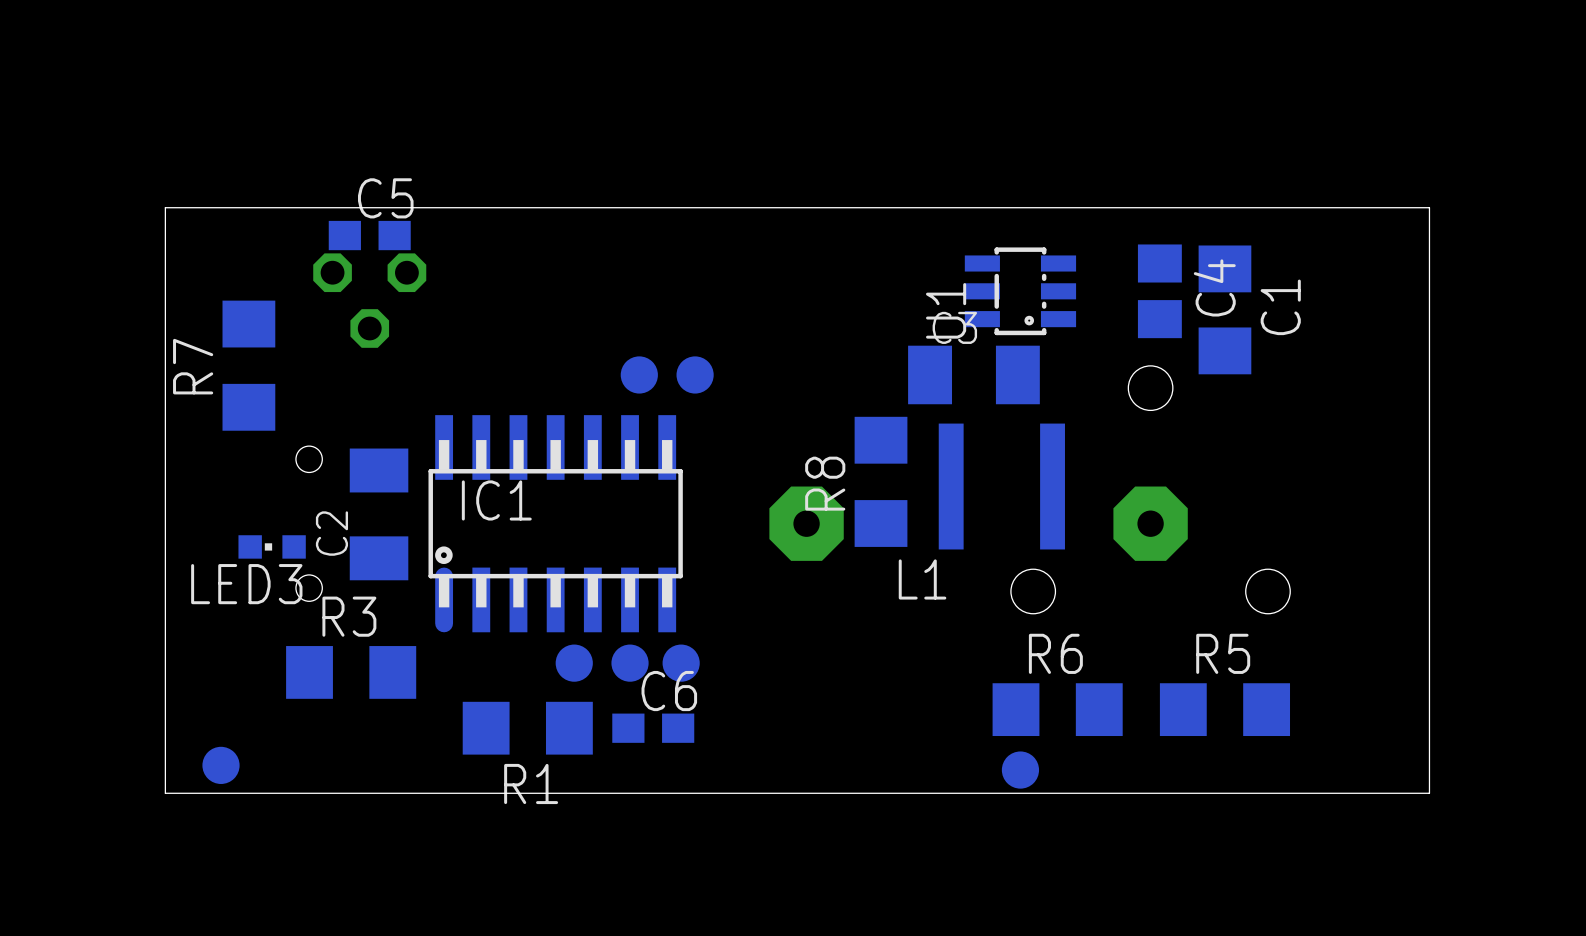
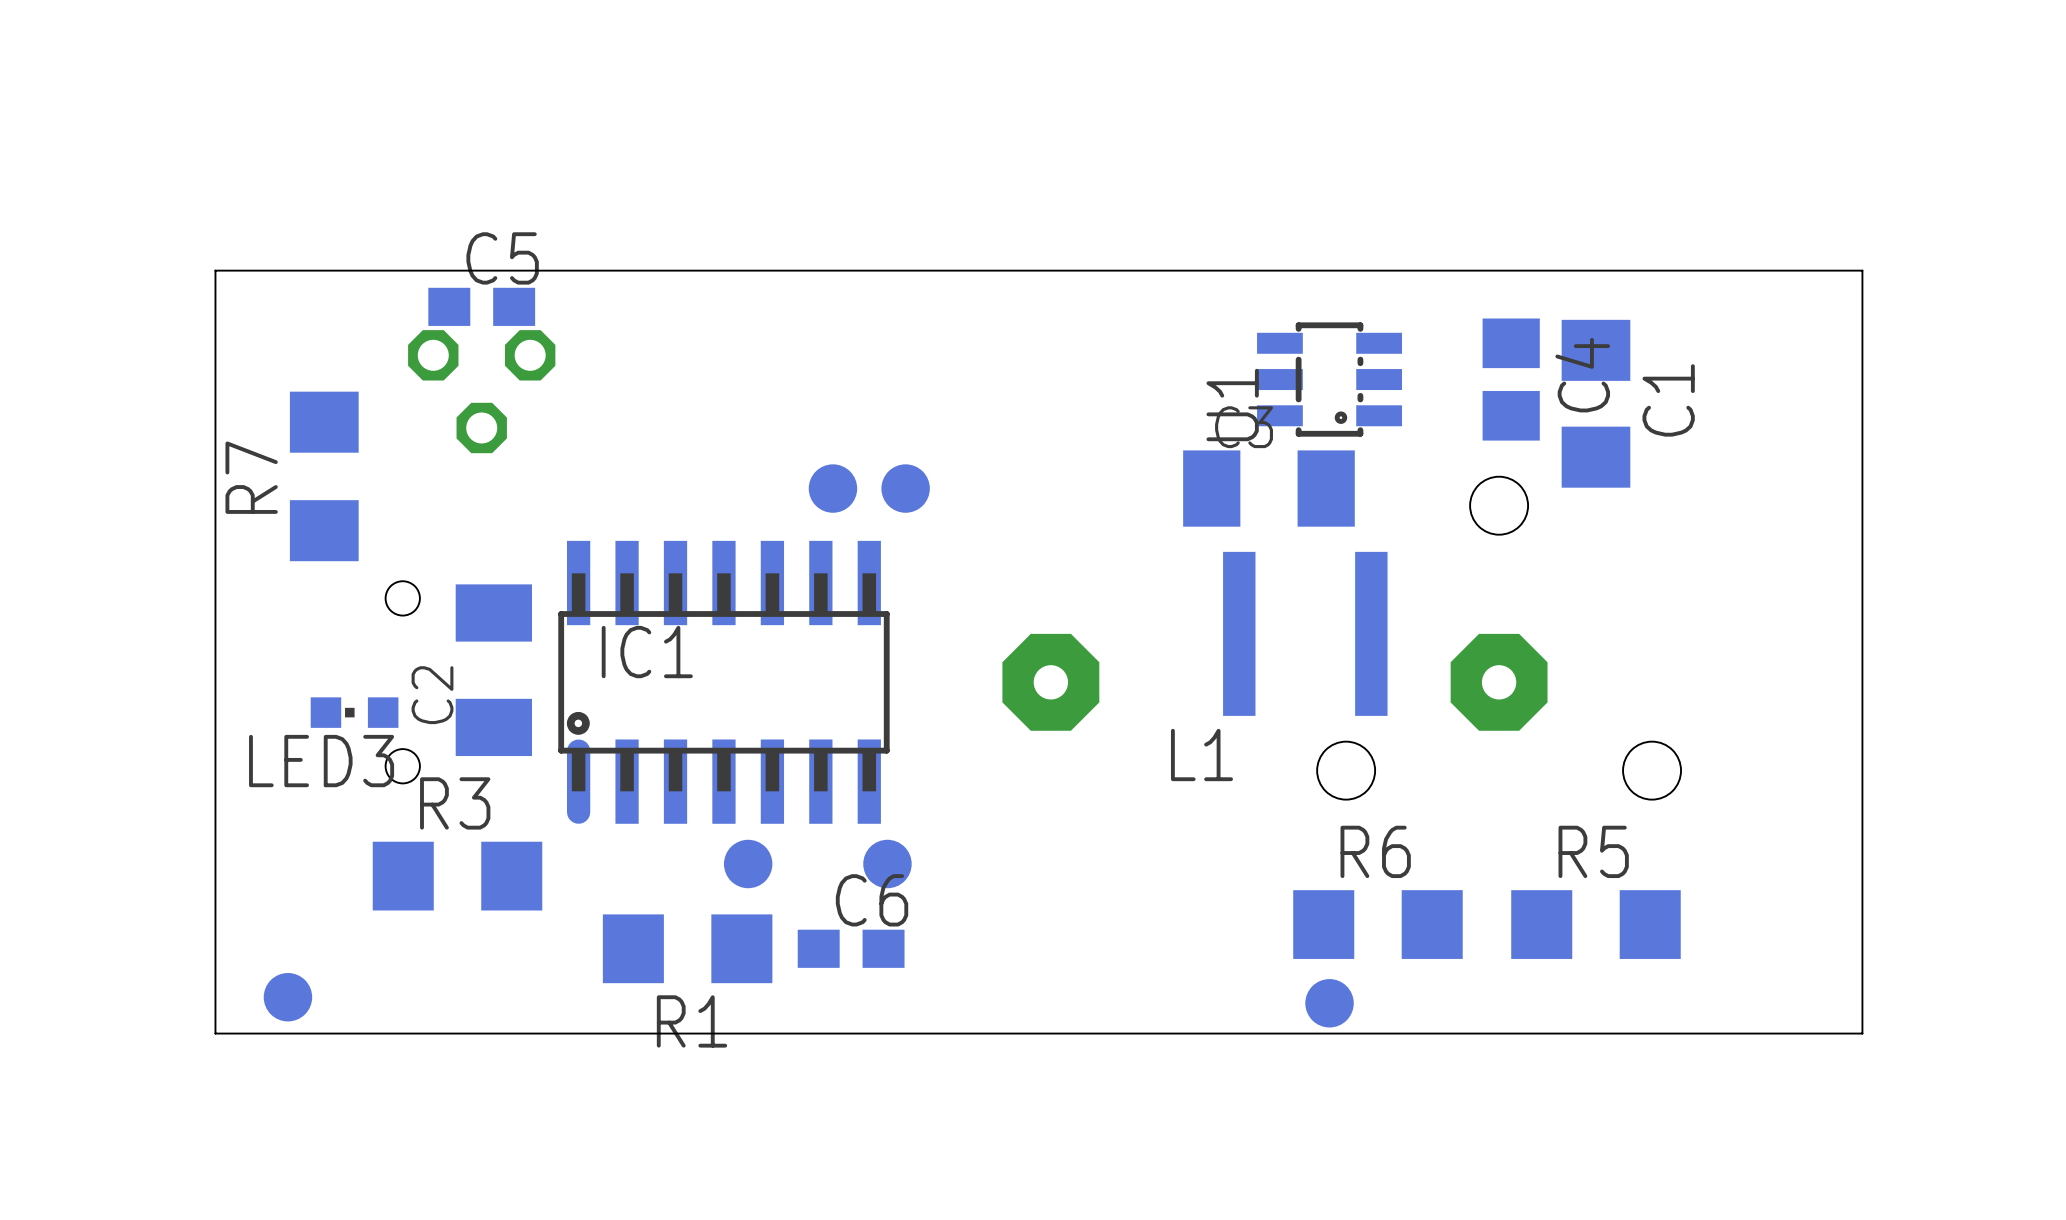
R8: (881, 481) -> none
part: (630, 663) -> none

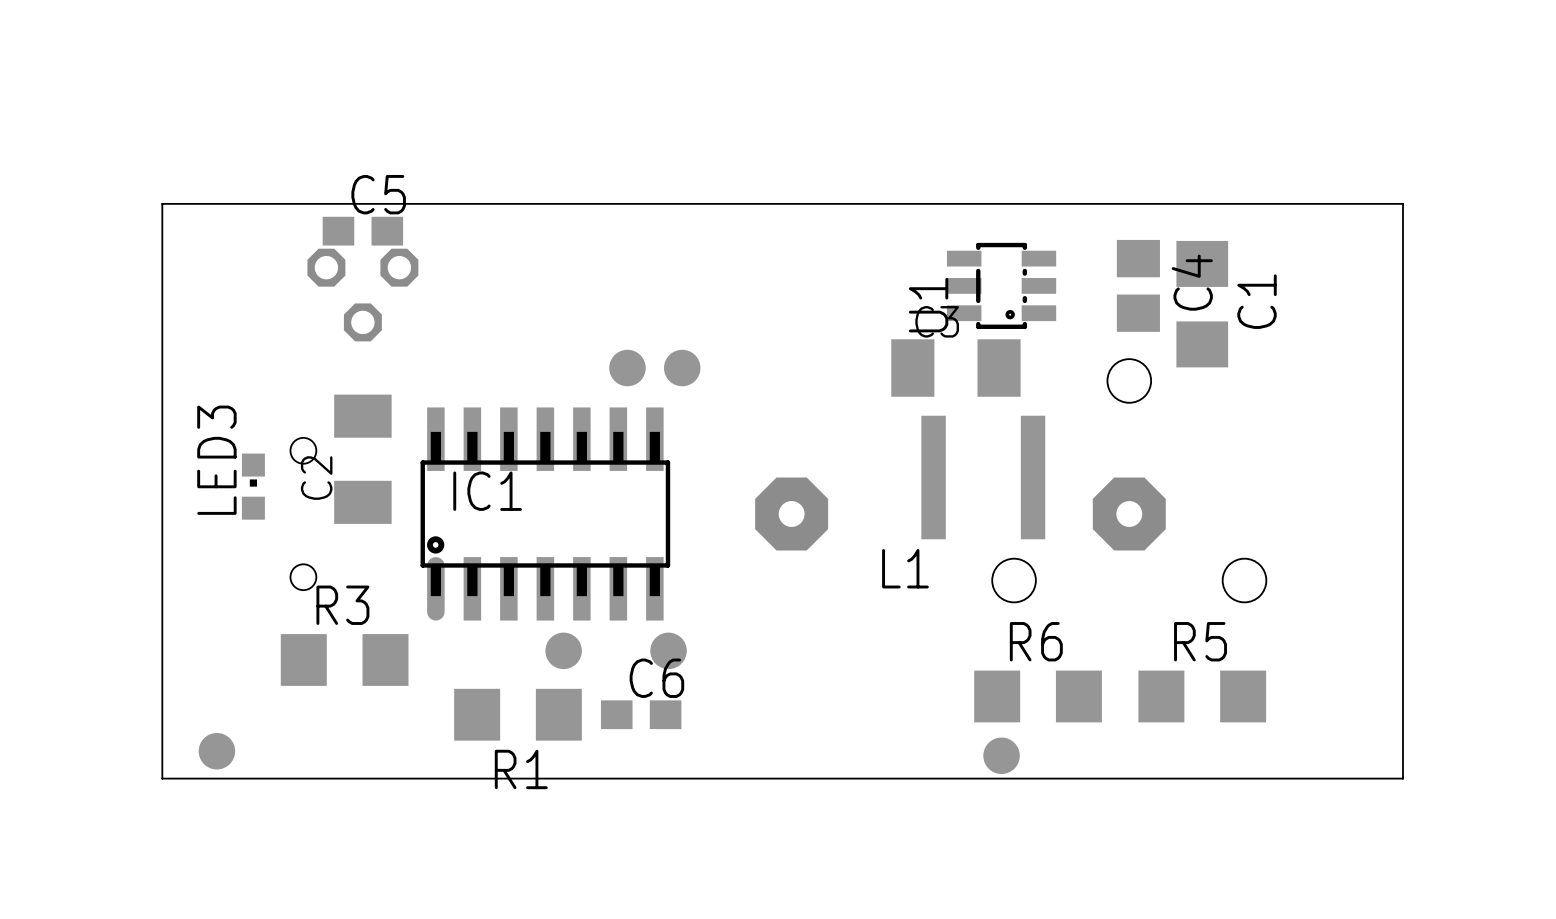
R7: (324, 476) -> none
C2 position: (493, 670) -> (362, 459)
LED3 rotation: 0° (354, 712) -> 90° clockwise (253, 486)
LED3 position: (354, 712) -> (253, 486)

